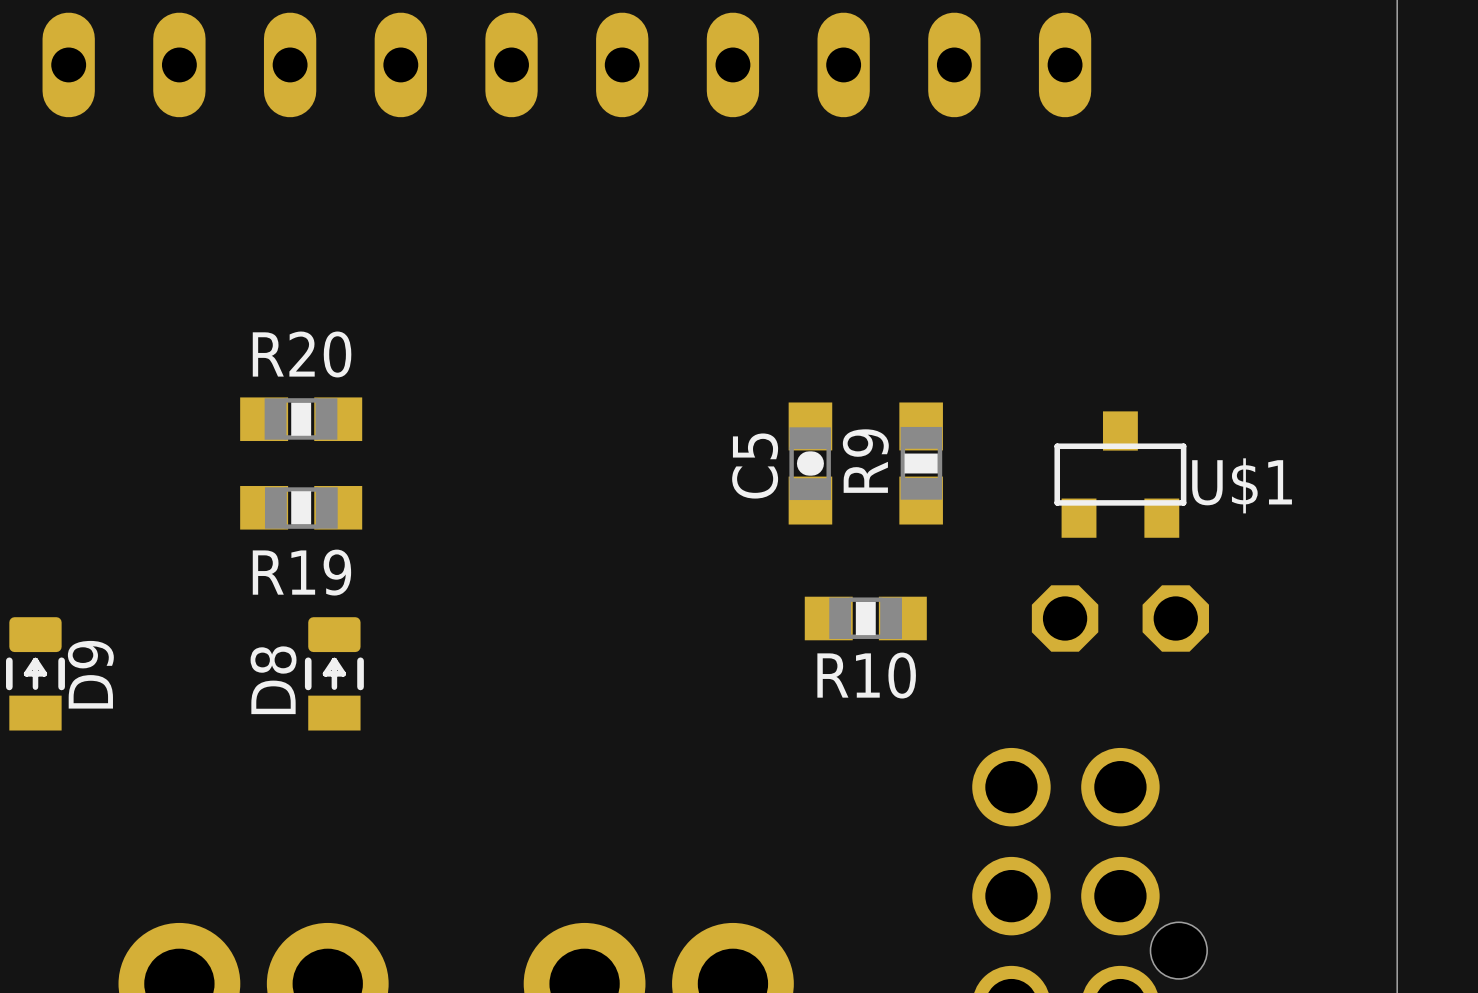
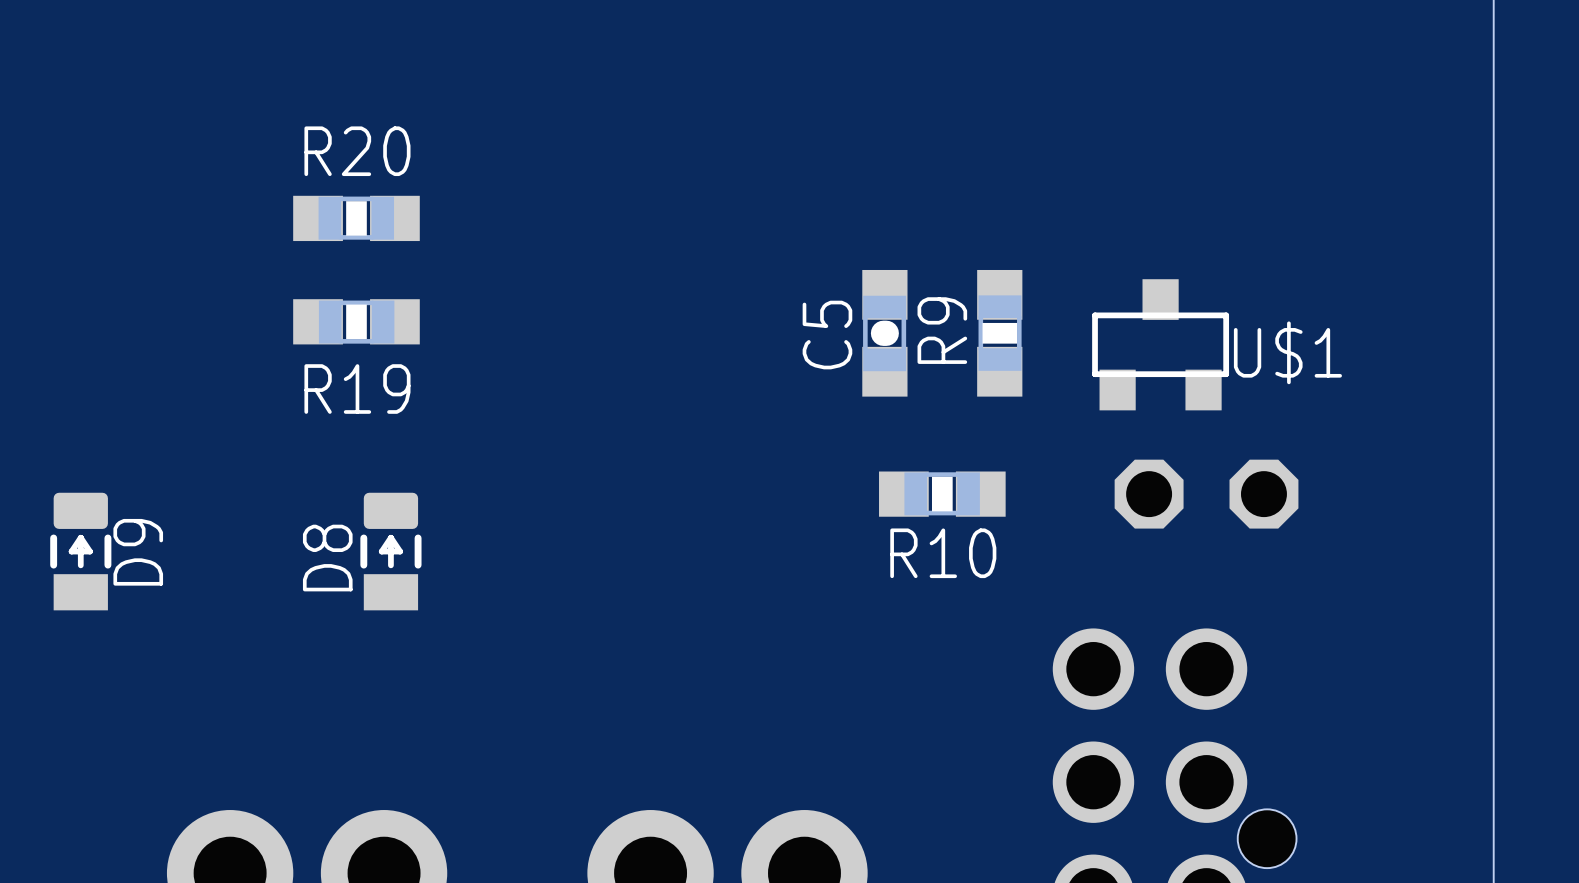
R20 position: (301, 419) -> (356, 218)
U$1 position: (1120, 474) -> (1160, 344)
R19 position: (301, 507) -> (356, 321)

